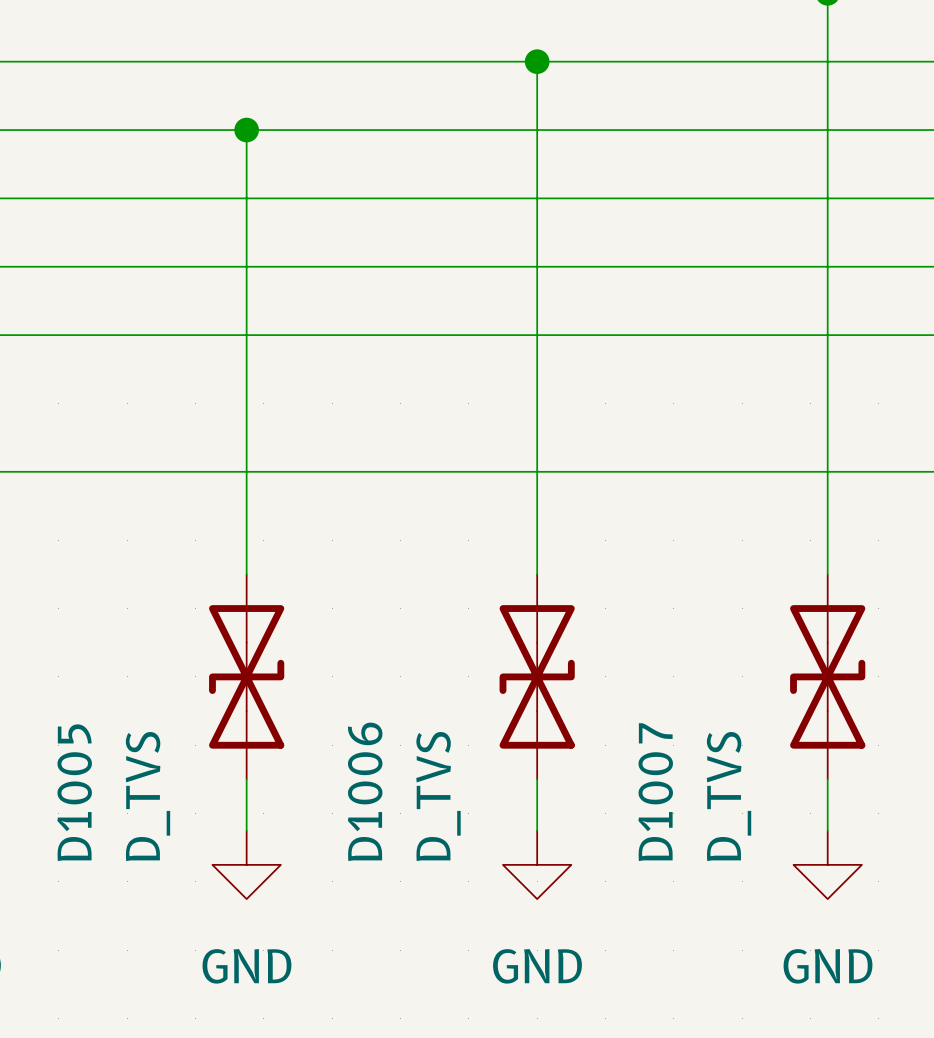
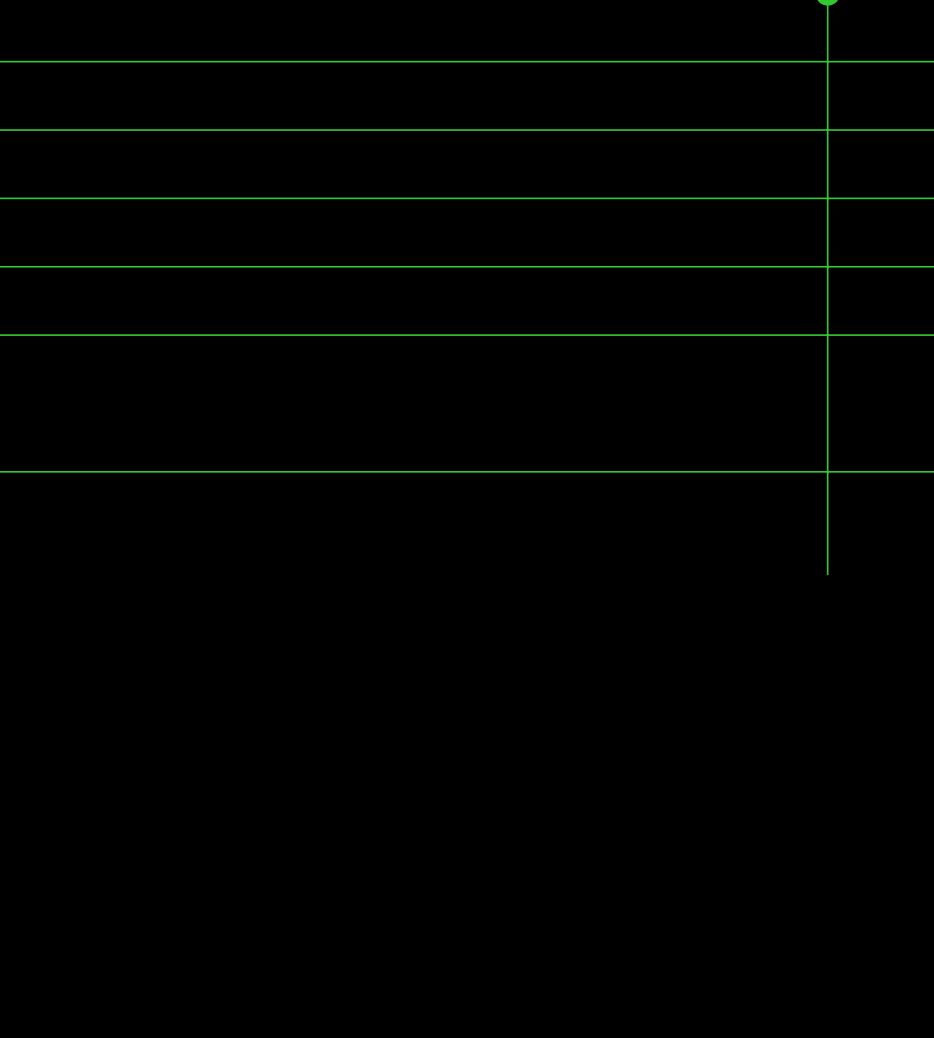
wire: (537, 61) (537, 574) -> none
junction: (537, 61) -> none
wire: (246, 130) (246, 574) -> none
junction: (246, 130) -> none
D1005: D_TVS (246, 676) -> none
D1006: D_TVS (537, 676) -> none
D1007: D_TVS (827, 676) -> none
wire: (246, 779) (246, 830) -> none
wire: (537, 779) (537, 830) -> none
wire: (827, 779) (827, 830) -> none
power symbol: GND (246, 864) -> none
power symbol: GND (537, 864) -> none
power symbol: GND (827, 864) -> none

